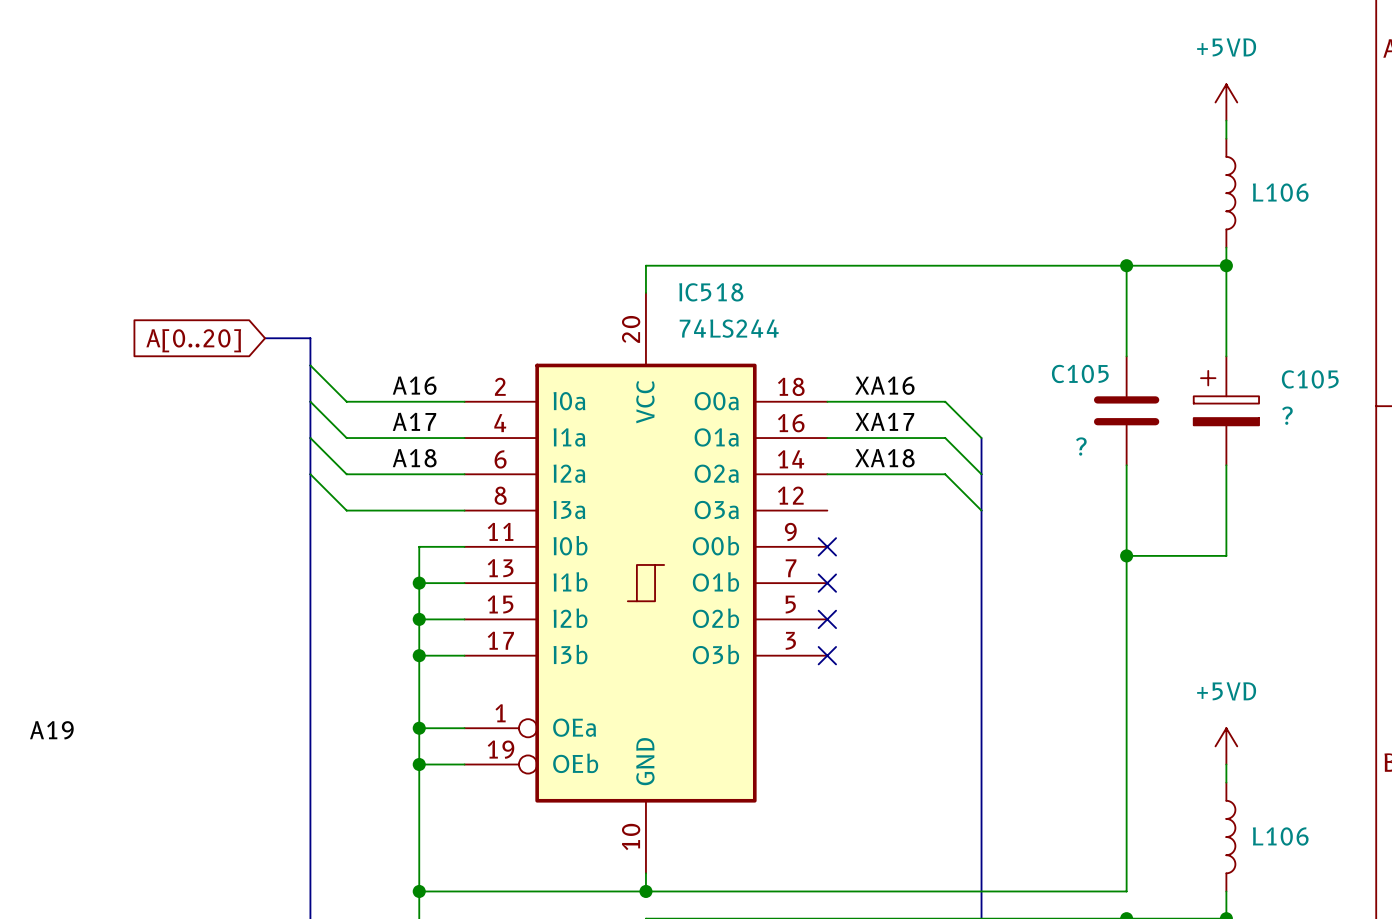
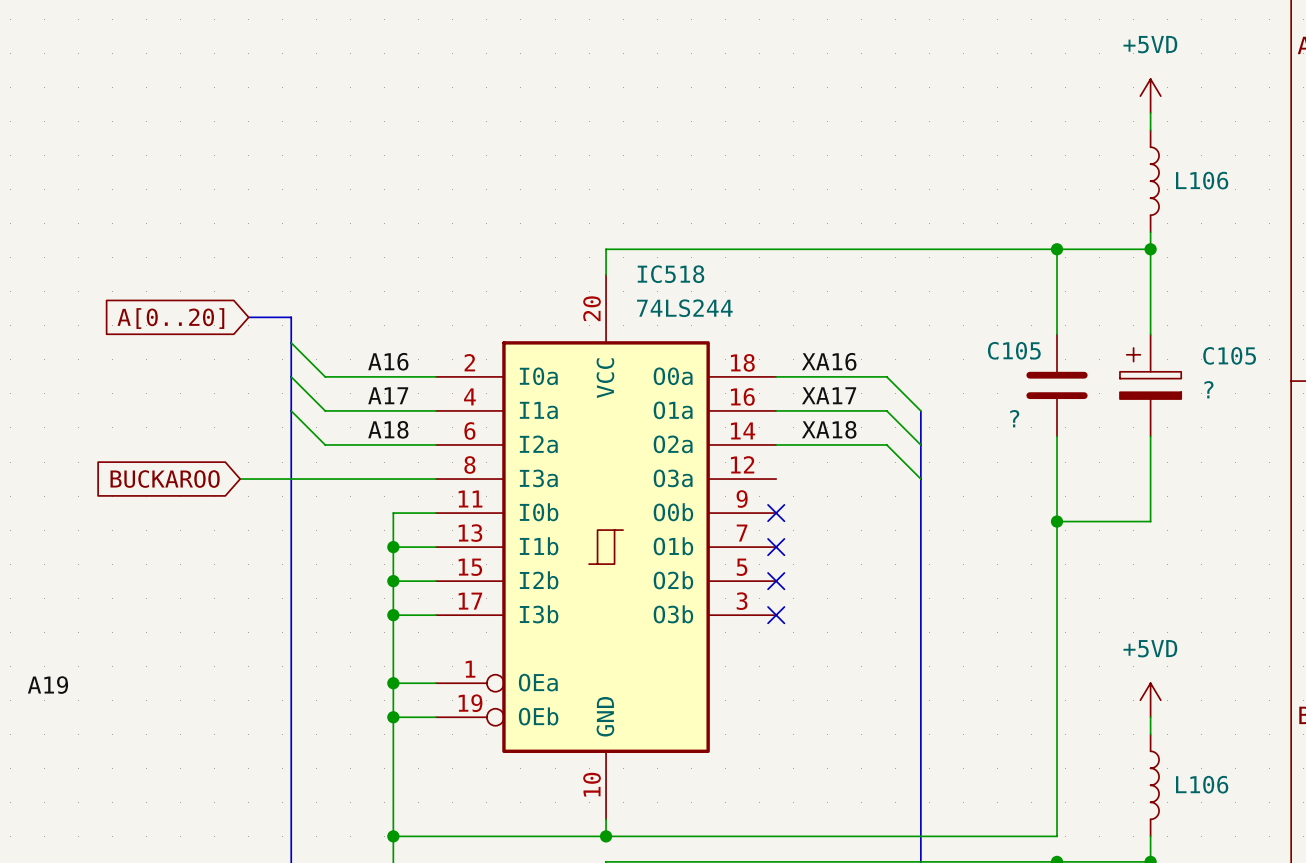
wire: (310, 474) (346, 510) -> (240, 479) (325, 479)
global label: none -> BUCKAROO (165, 479)

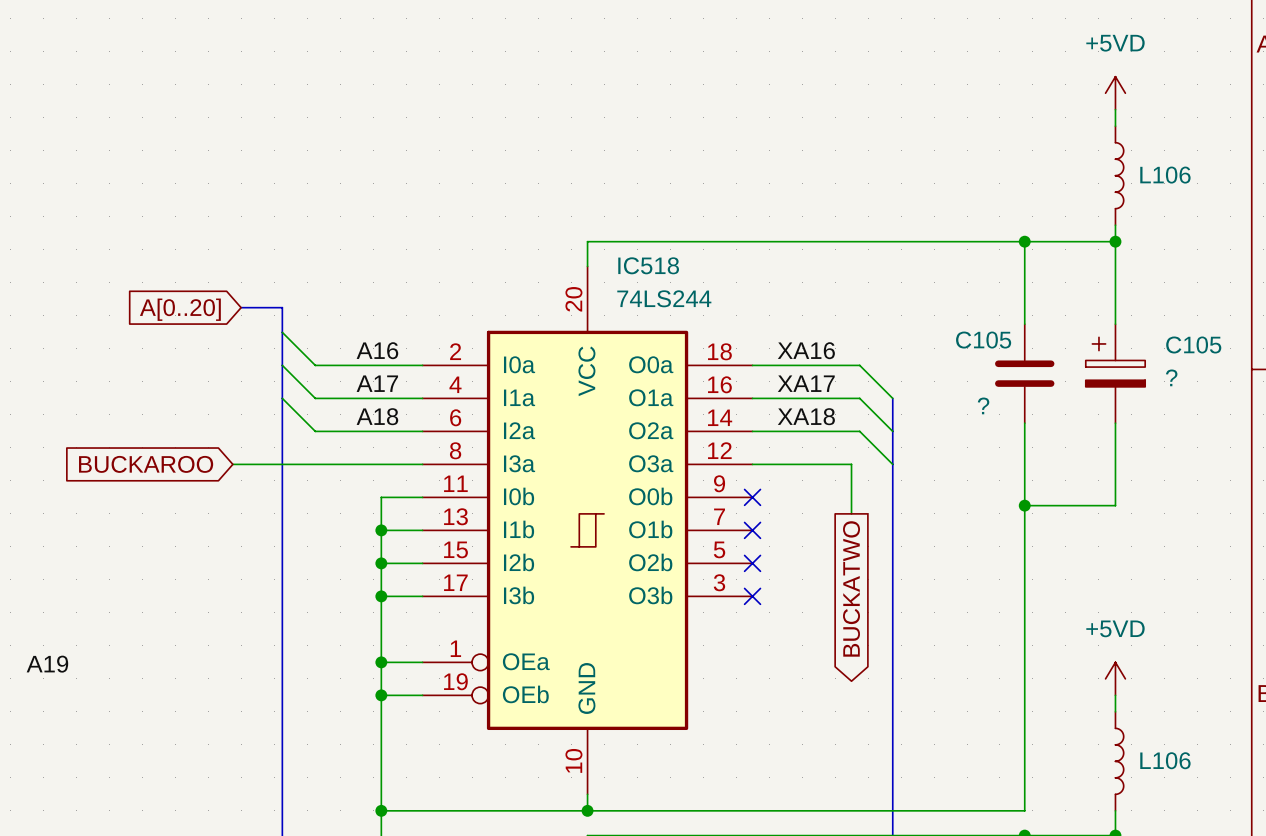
wire: none -> (752, 464) (851, 464) (851, 513)
global label: none -> BUCKATWO (851, 588)

